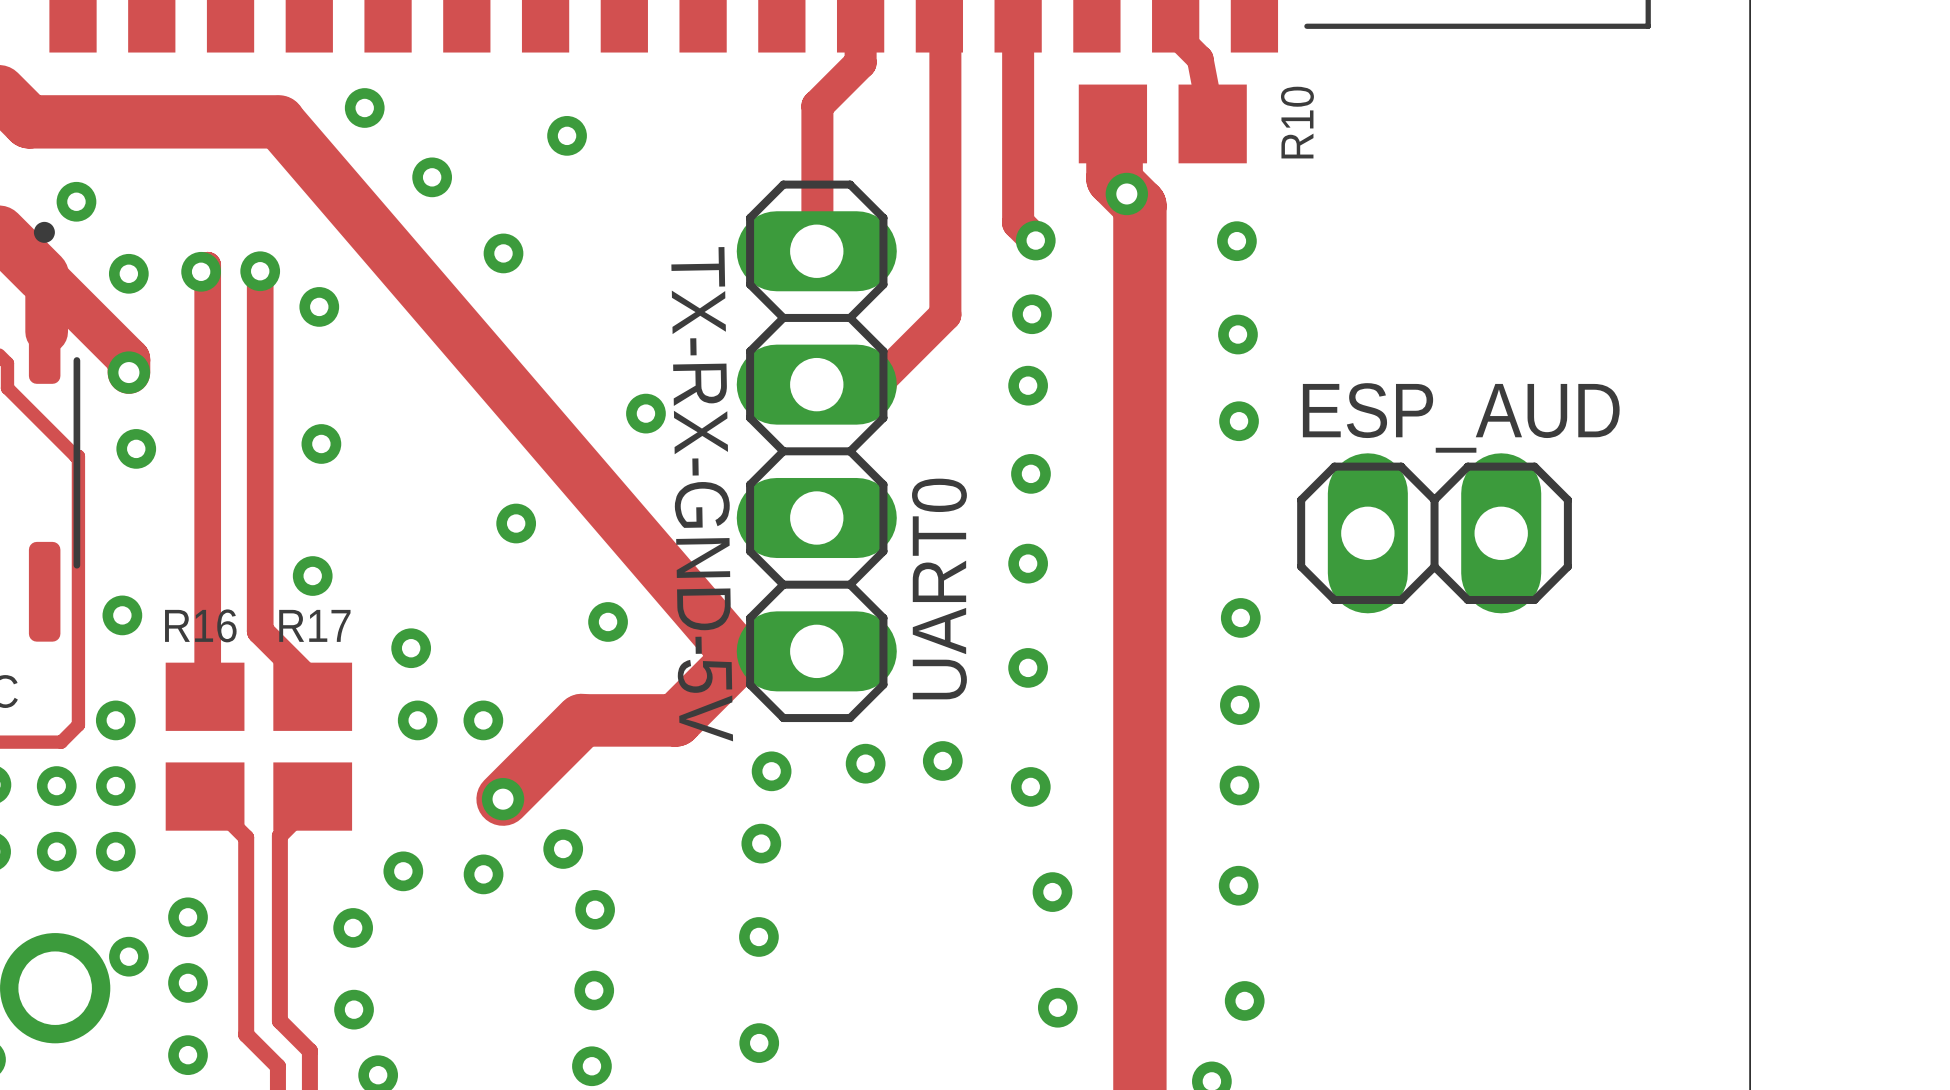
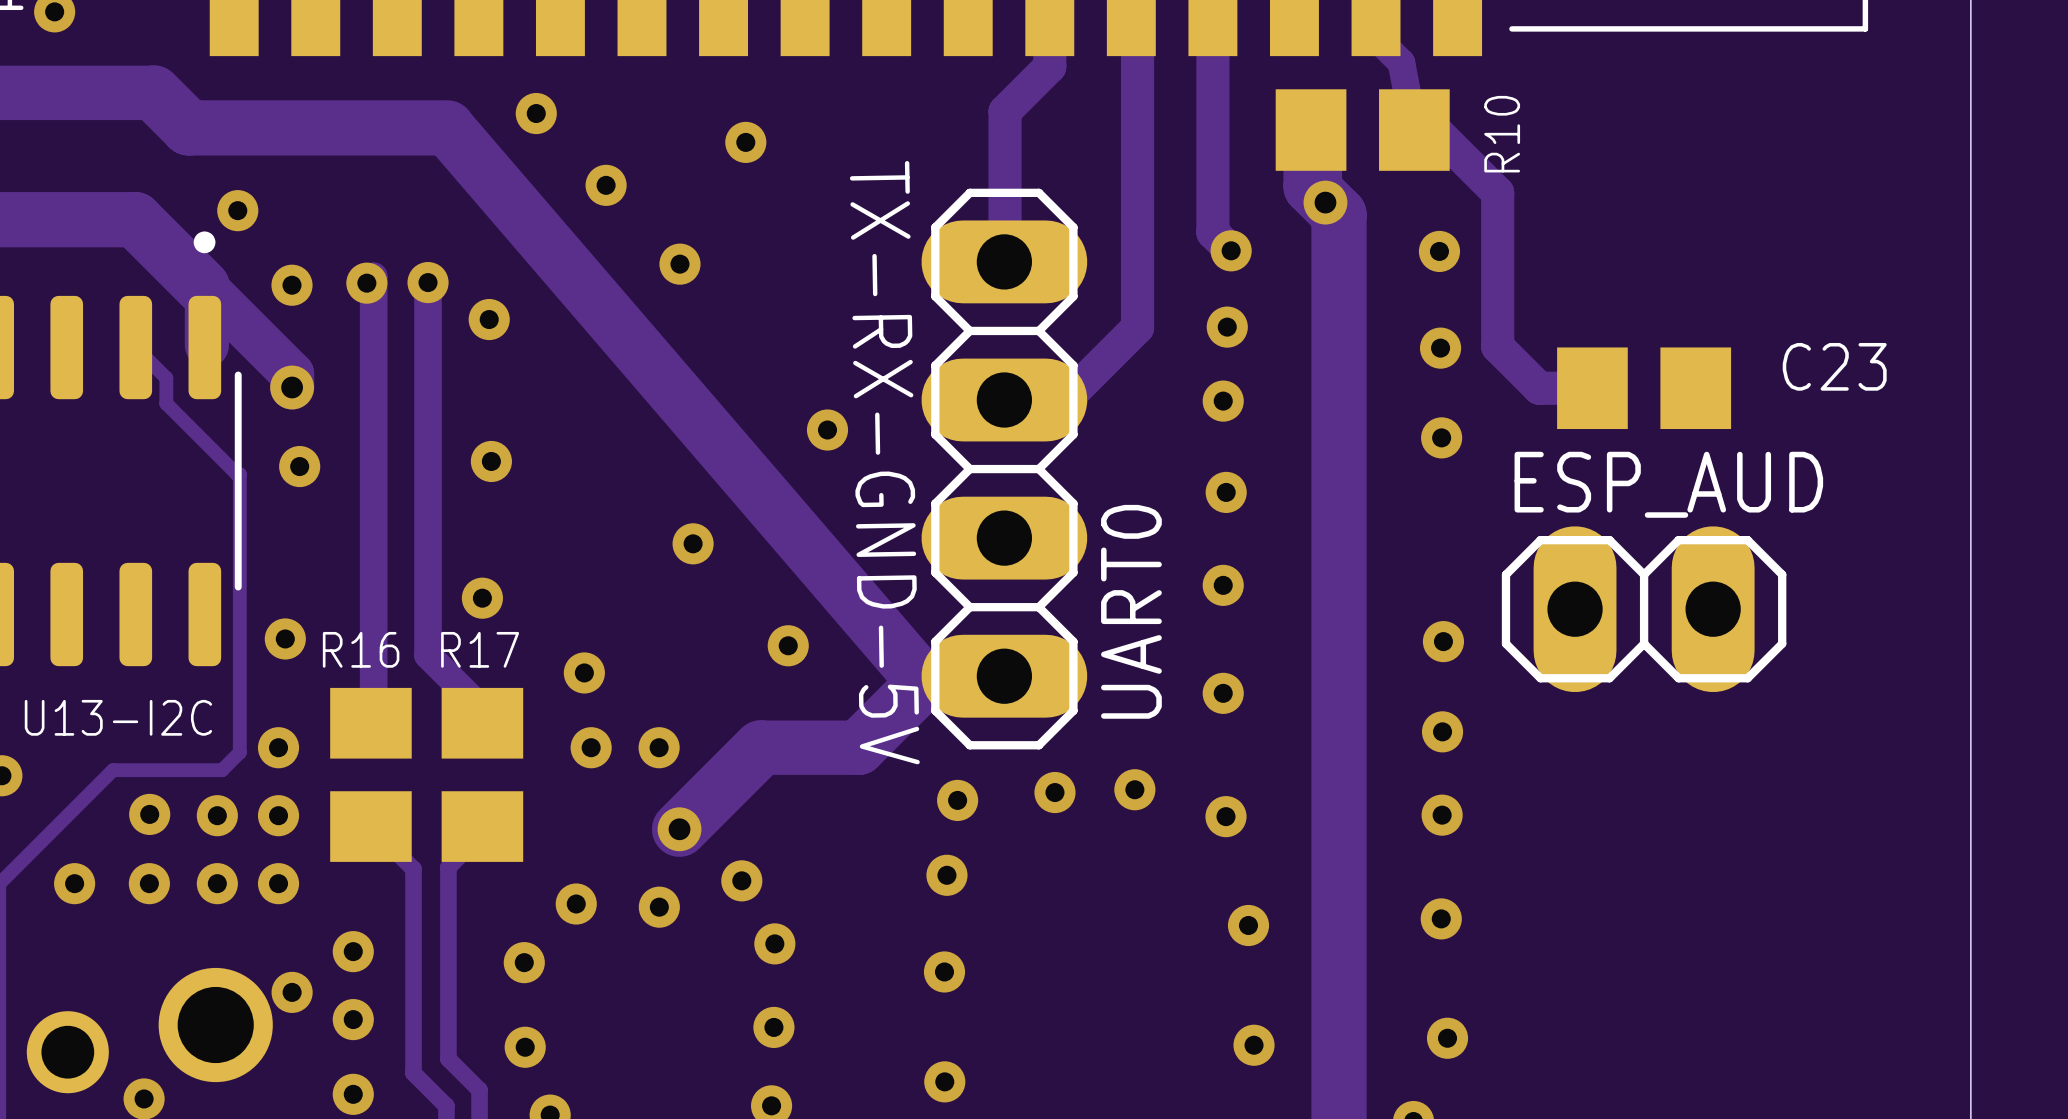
track: none -> (1414, 130) (1434, 130) (1497, 192) (1497, 346) (1539, 388) (1592, 388)
C23: none -> (1644, 388)
ESP_AUD position: (1434, 533) -> (1644, 609)

